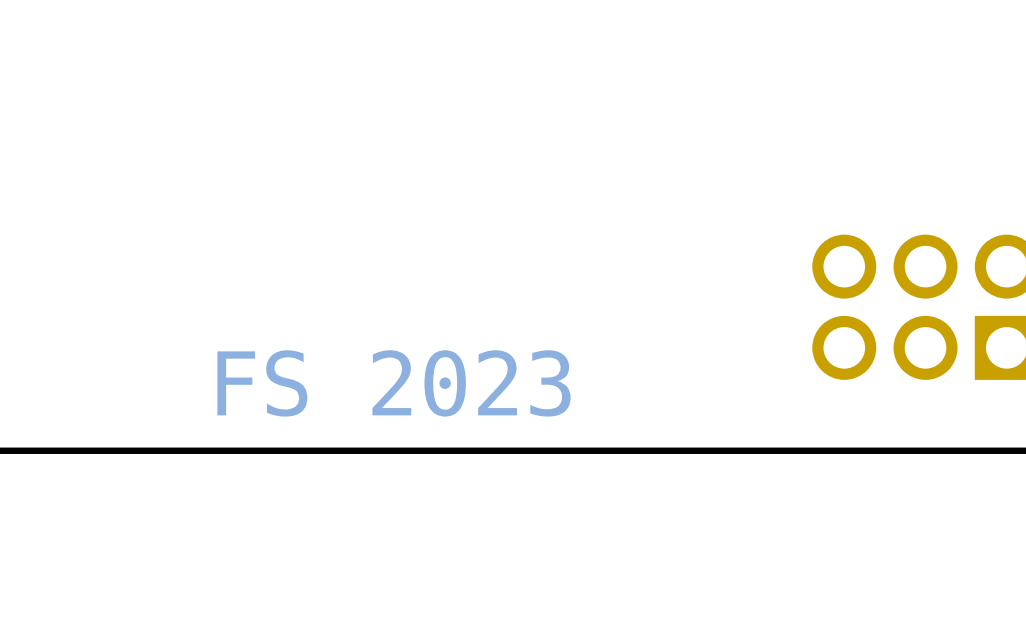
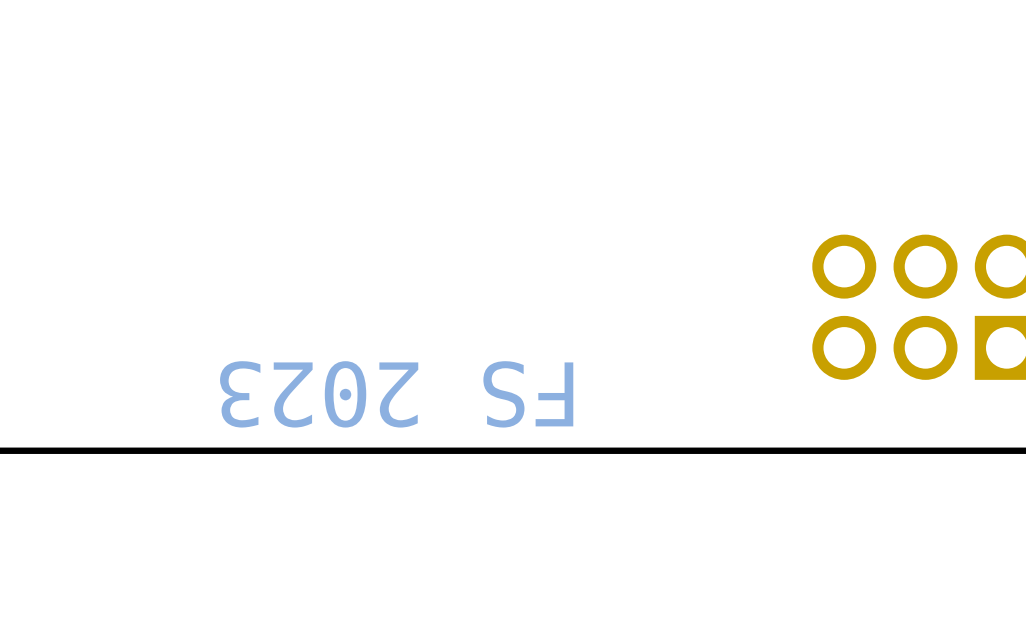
text rotation: 0° (394, 383) -> 180° (396, 394)

